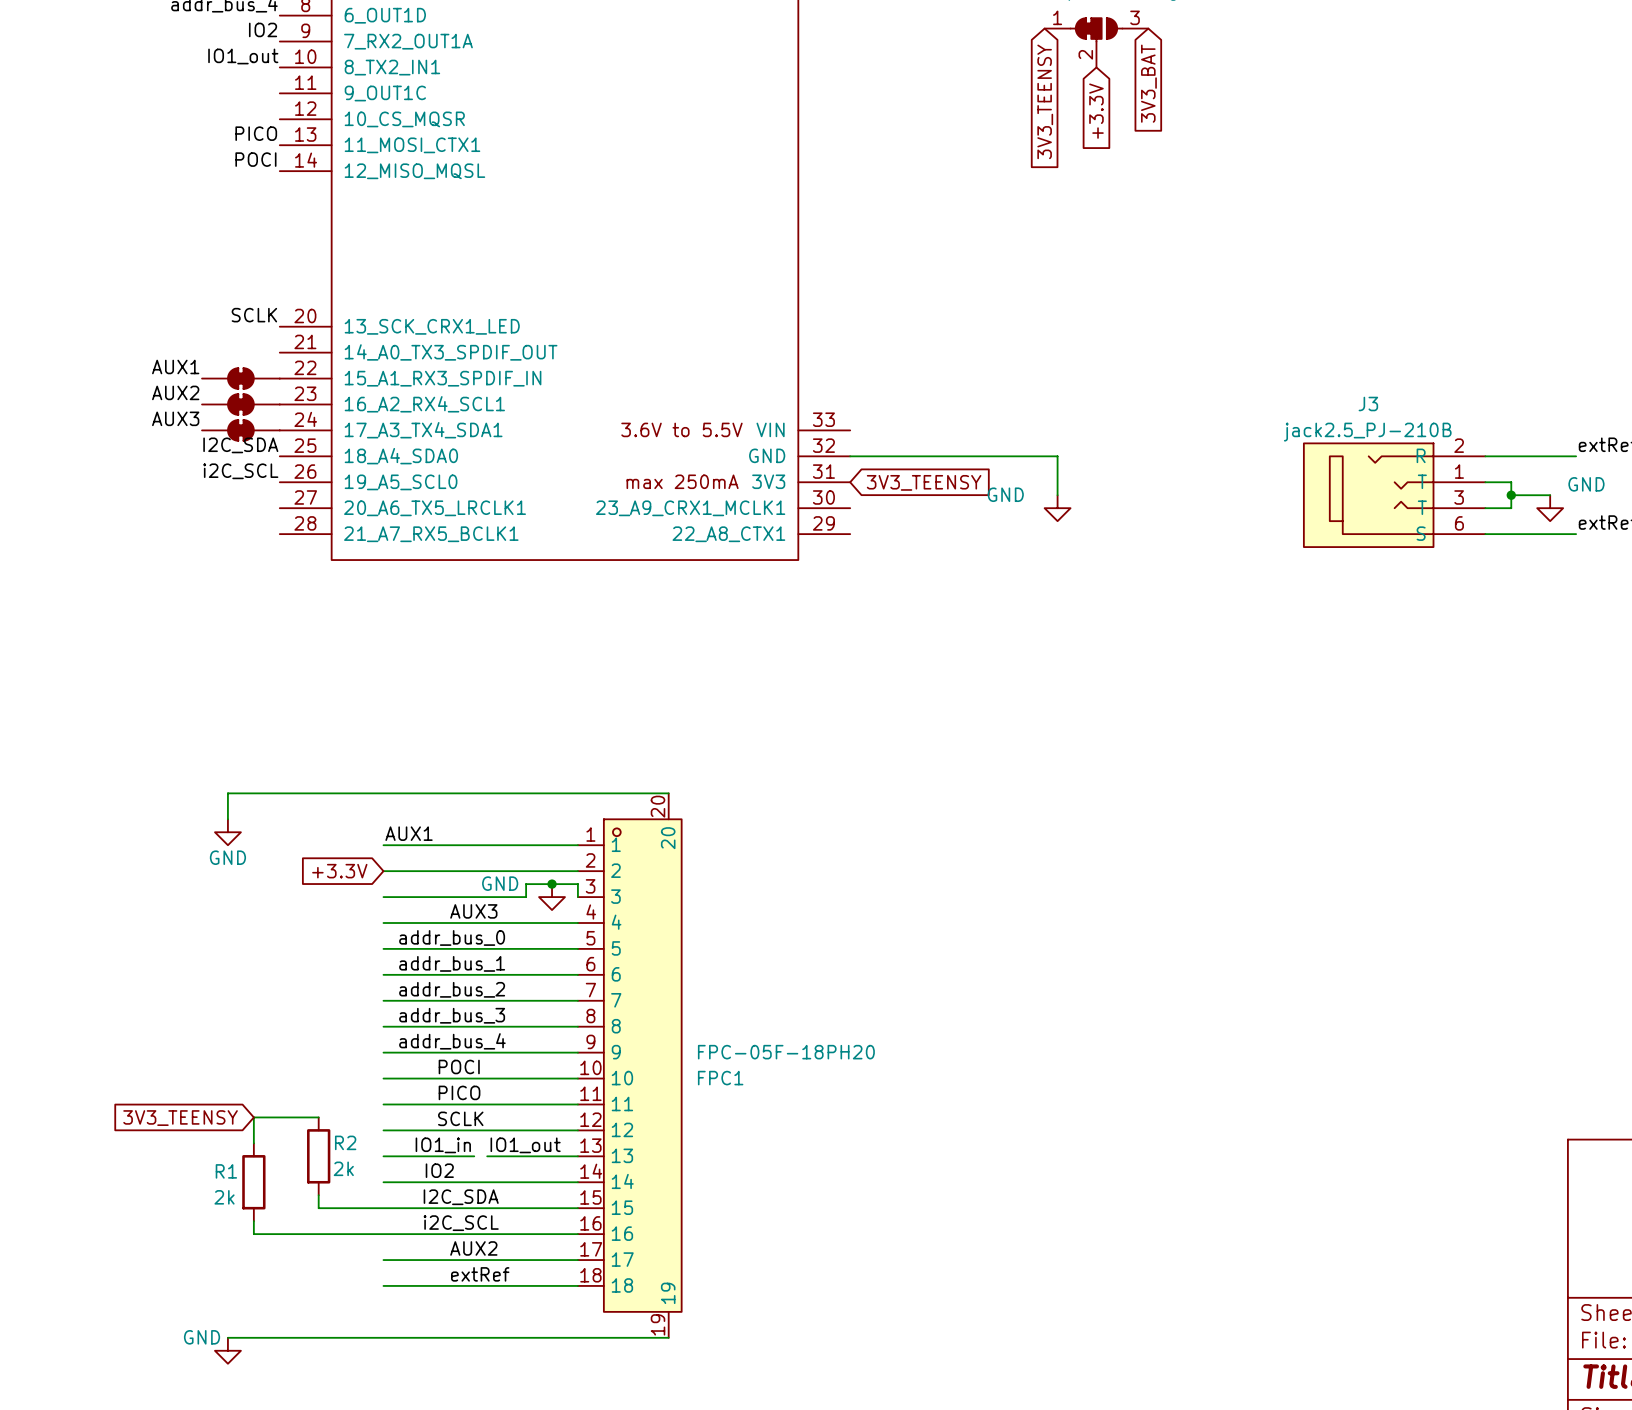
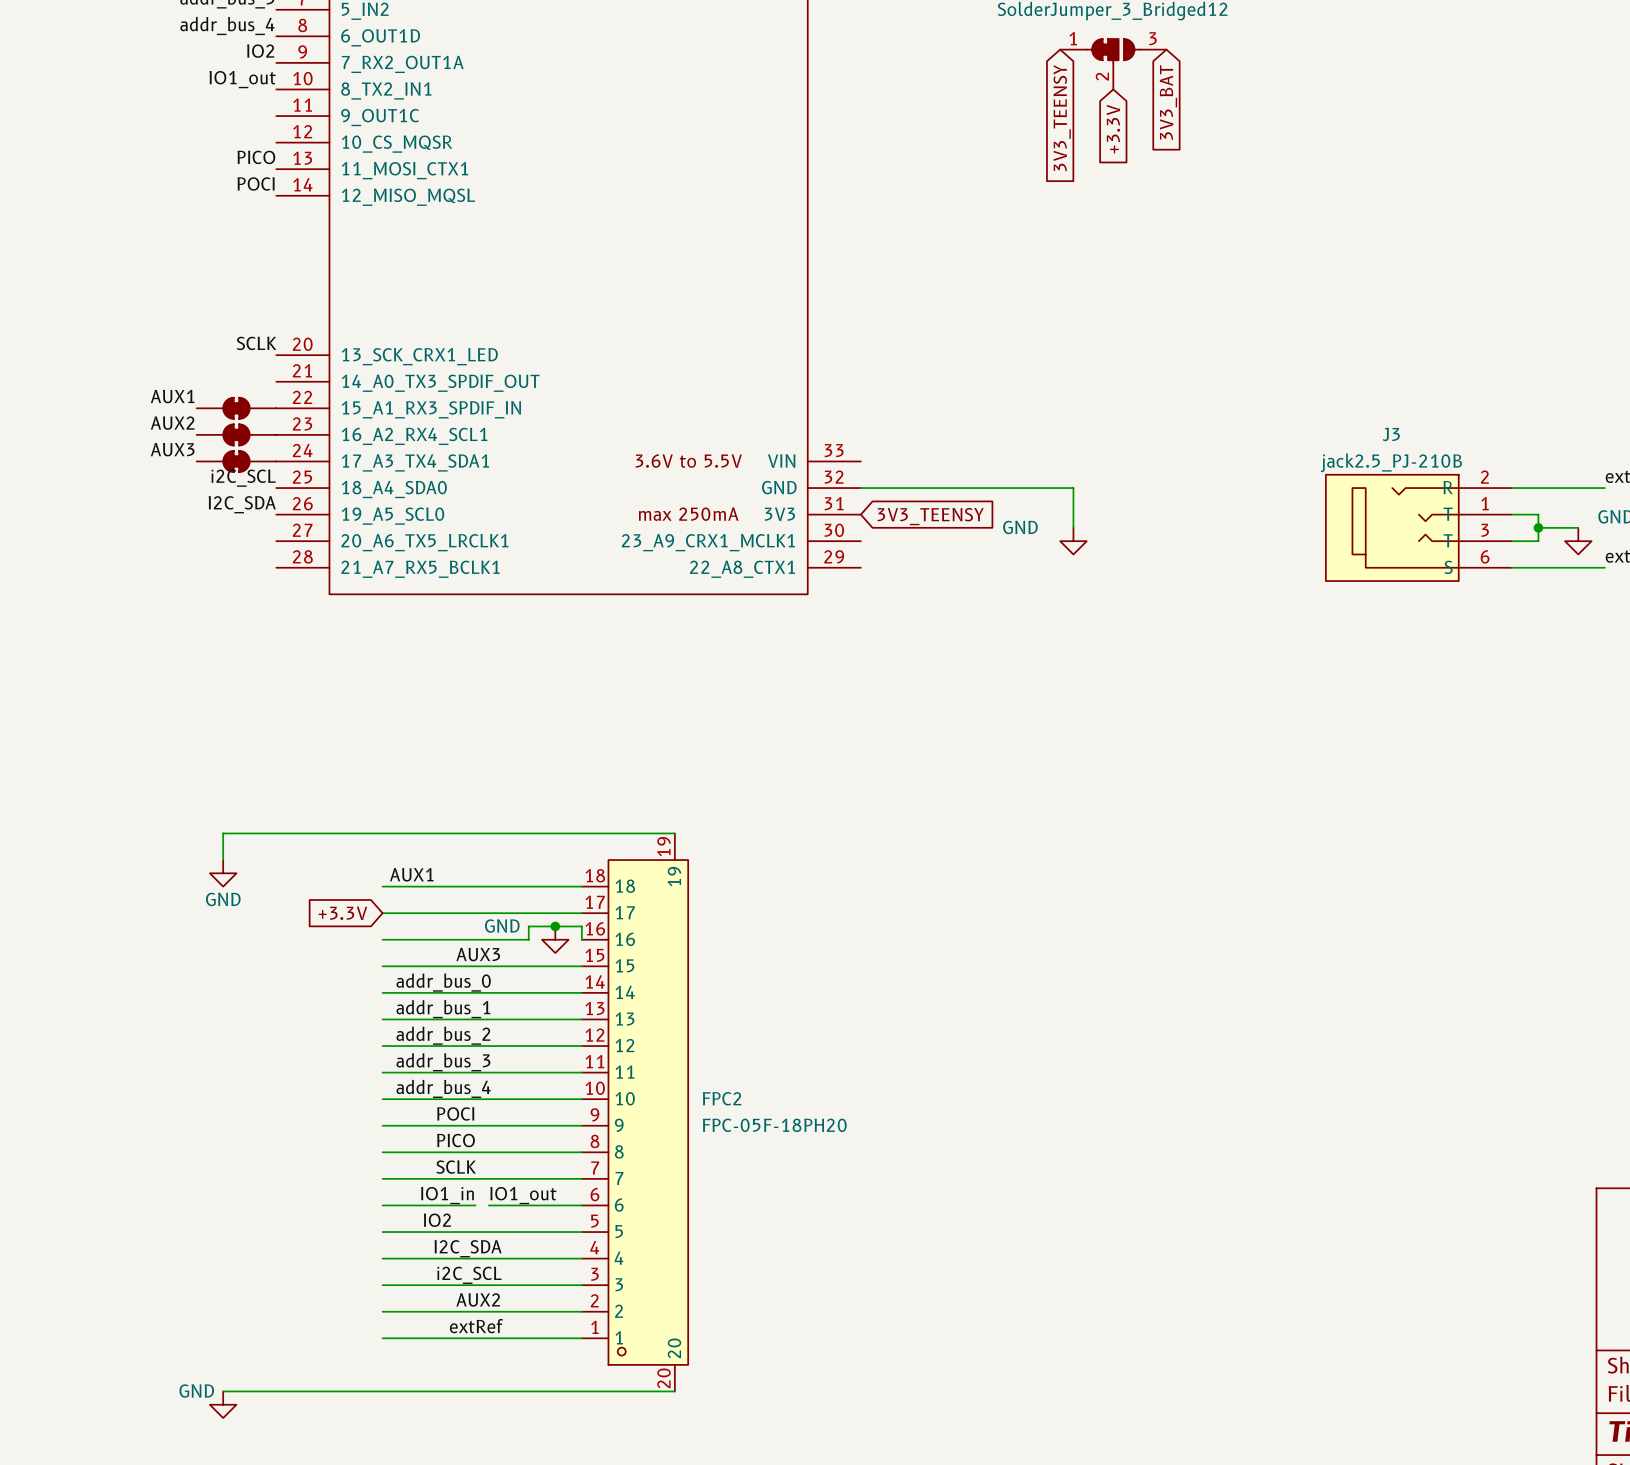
label: I2C_SDA (240, 445) -> i2C_SCL (243, 478)
label: i2C_SCL (240, 471) -> I2C_SDA (242, 504)
FPC1: FPC-05F-18PH20 (629, 1065) -> none
FPC2: none -> FPC-05F-18PH20 (635, 1112)
wire: (318, 1117) (253, 1117) (253, 1143) -> none
global label: 3V3_TEENSY (180, 1118) -> none
R2: 2k (318, 1156) -> none
R1: 2k (253, 1182) -> none
wire: (318, 1195) (318, 1208) (383, 1208) -> none
wire: (253, 1221) (253, 1234) (383, 1234) -> none

